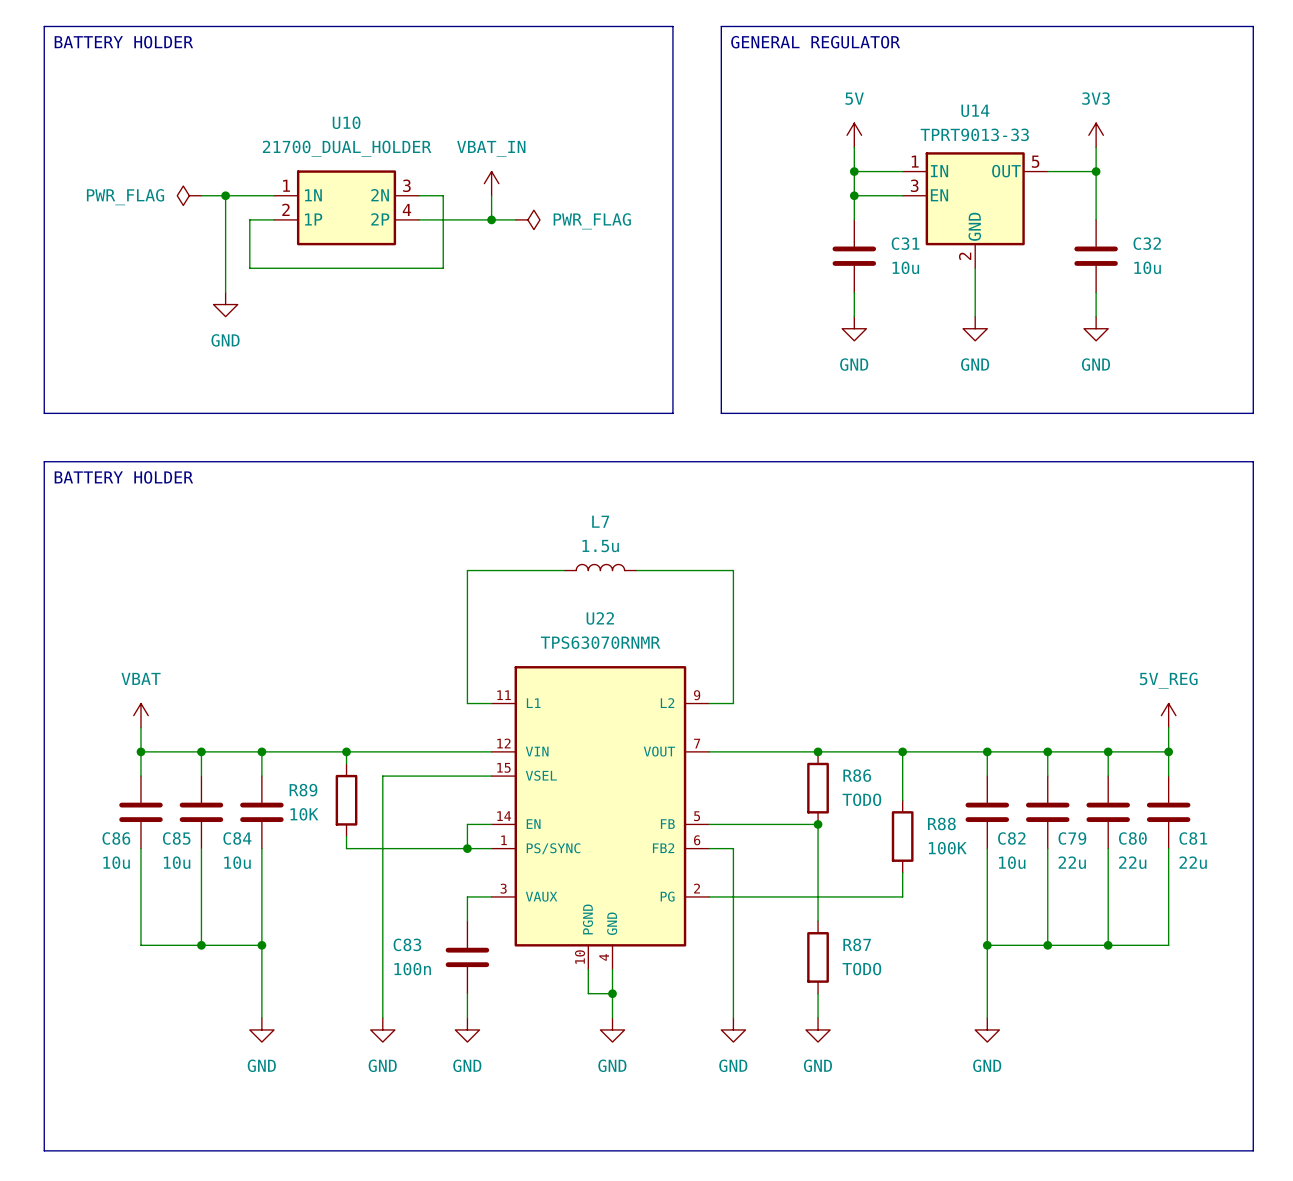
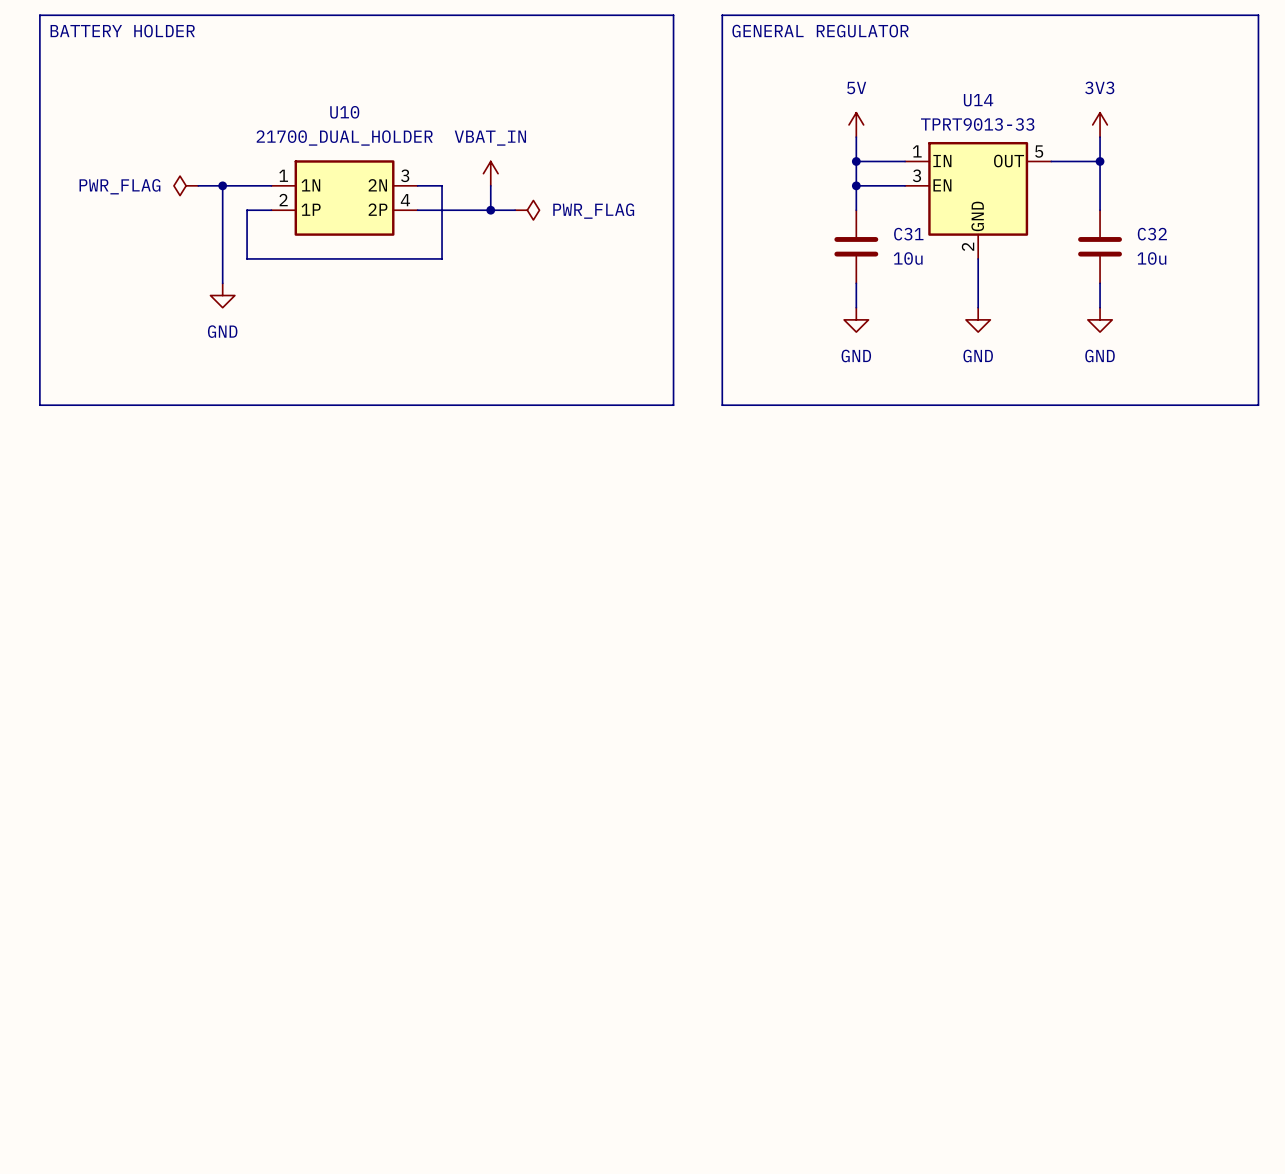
line: (44, 461) (1253, 461) (1253, 1150) (44, 1150) (44, 461) -> none
text: BATTERY HOLDER (123, 477) -> none
L7: 1.5u (600, 567) -> none
wire: (564, 570) (467, 570) (467, 703) (491, 703) -> none
wire: (636, 570) (733, 570) (733, 703) (709, 703) -> none
power symbol: VBAT (140, 715) -> none
power symbol: 5V_REG (1168, 715) -> none
wire: (140, 727) (140, 776) -> none
wire: (1168, 727) (1168, 776) -> none
wire: (140, 751) (491, 751) -> none
junction: (140, 751) -> none
wire: (201, 751) (201, 776) -> none
junction: (201, 751) -> none
wire: (261, 751) (261, 776) -> none
junction: (261, 751) -> none
wire: (346, 751) (346, 763) -> none
junction: (346, 751) -> none
wire: (709, 751) (1168, 751) -> none
junction: (818, 751) -> none
wire: (902, 751) (902, 800) -> none
junction: (902, 751) -> none
wire: (987, 751) (987, 776) -> none
junction: (987, 751) -> none
wire: (1047, 751) (1047, 776) -> none
junction: (1047, 751) -> none
wire: (1108, 751) (1108, 776) -> none
junction: (1108, 751) -> none
junction: (1168, 751) -> none
wire: (491, 776) (382, 776) (382, 1017) -> none
R86: TODO (818, 788) -> none
R89: 10K (346, 800) -> none
C86: 10u (140, 812) -> none
C85: 10u (201, 812) -> none
C84: 10u (261, 812) -> none
C82: 10u (987, 812) -> none
C79: 22u (1047, 812) -> none
C80: 22u (1108, 812) -> none
C81: 22u (1168, 812) -> none
U22: TPS63070RNMR (600, 817) -> none
wire: (491, 824) (467, 824) (467, 848) -> none
wire: (709, 824) (818, 824) (818, 921) -> none
junction: (818, 824) -> none
wire: (346, 836) (346, 848) (491, 848) -> none
R88: 100K (902, 836) -> none
wire: (140, 848) (140, 945) (261, 945) -> none
wire: (201, 848) (201, 945) -> none
wire: (261, 848) (261, 1017) -> none
junction: (467, 848) -> none
wire: (709, 848) (733, 848) (733, 1017) -> none
wire: (987, 848) (987, 1017) -> none
wire: (1047, 848) (1047, 945) -> none
wire: (1108, 848) (1108, 945) -> none
wire: (1168, 848) (1168, 945) (987, 945) -> none
wire: (902, 872) (902, 896) (709, 896) -> none
wire: (491, 896) (467, 896) (467, 921) -> none
junction: (201, 945) -> none
junction: (261, 945) -> none
junction: (987, 945) -> none
junction: (1047, 945) -> none
junction: (1108, 945) -> none
C83: 100n (467, 957) -> none
R87: TODO (818, 957) -> none
wire: (588, 969) (588, 993) (612, 993) -> none
wire: (612, 969) (612, 1017) -> none
wire: (467, 993) (467, 1017) -> none
junction: (612, 993) -> none
wire: (818, 993) (818, 1017) -> none
power symbol: GND (261, 1029) -> none
power symbol: GND (382, 1029) -> none
power symbol: GND (467, 1029) -> none
power symbol: GND (612, 1029) -> none
power symbol: GND (733, 1029) -> none
power symbol: GND (818, 1029) -> none
power symbol: GND (987, 1029) -> none

